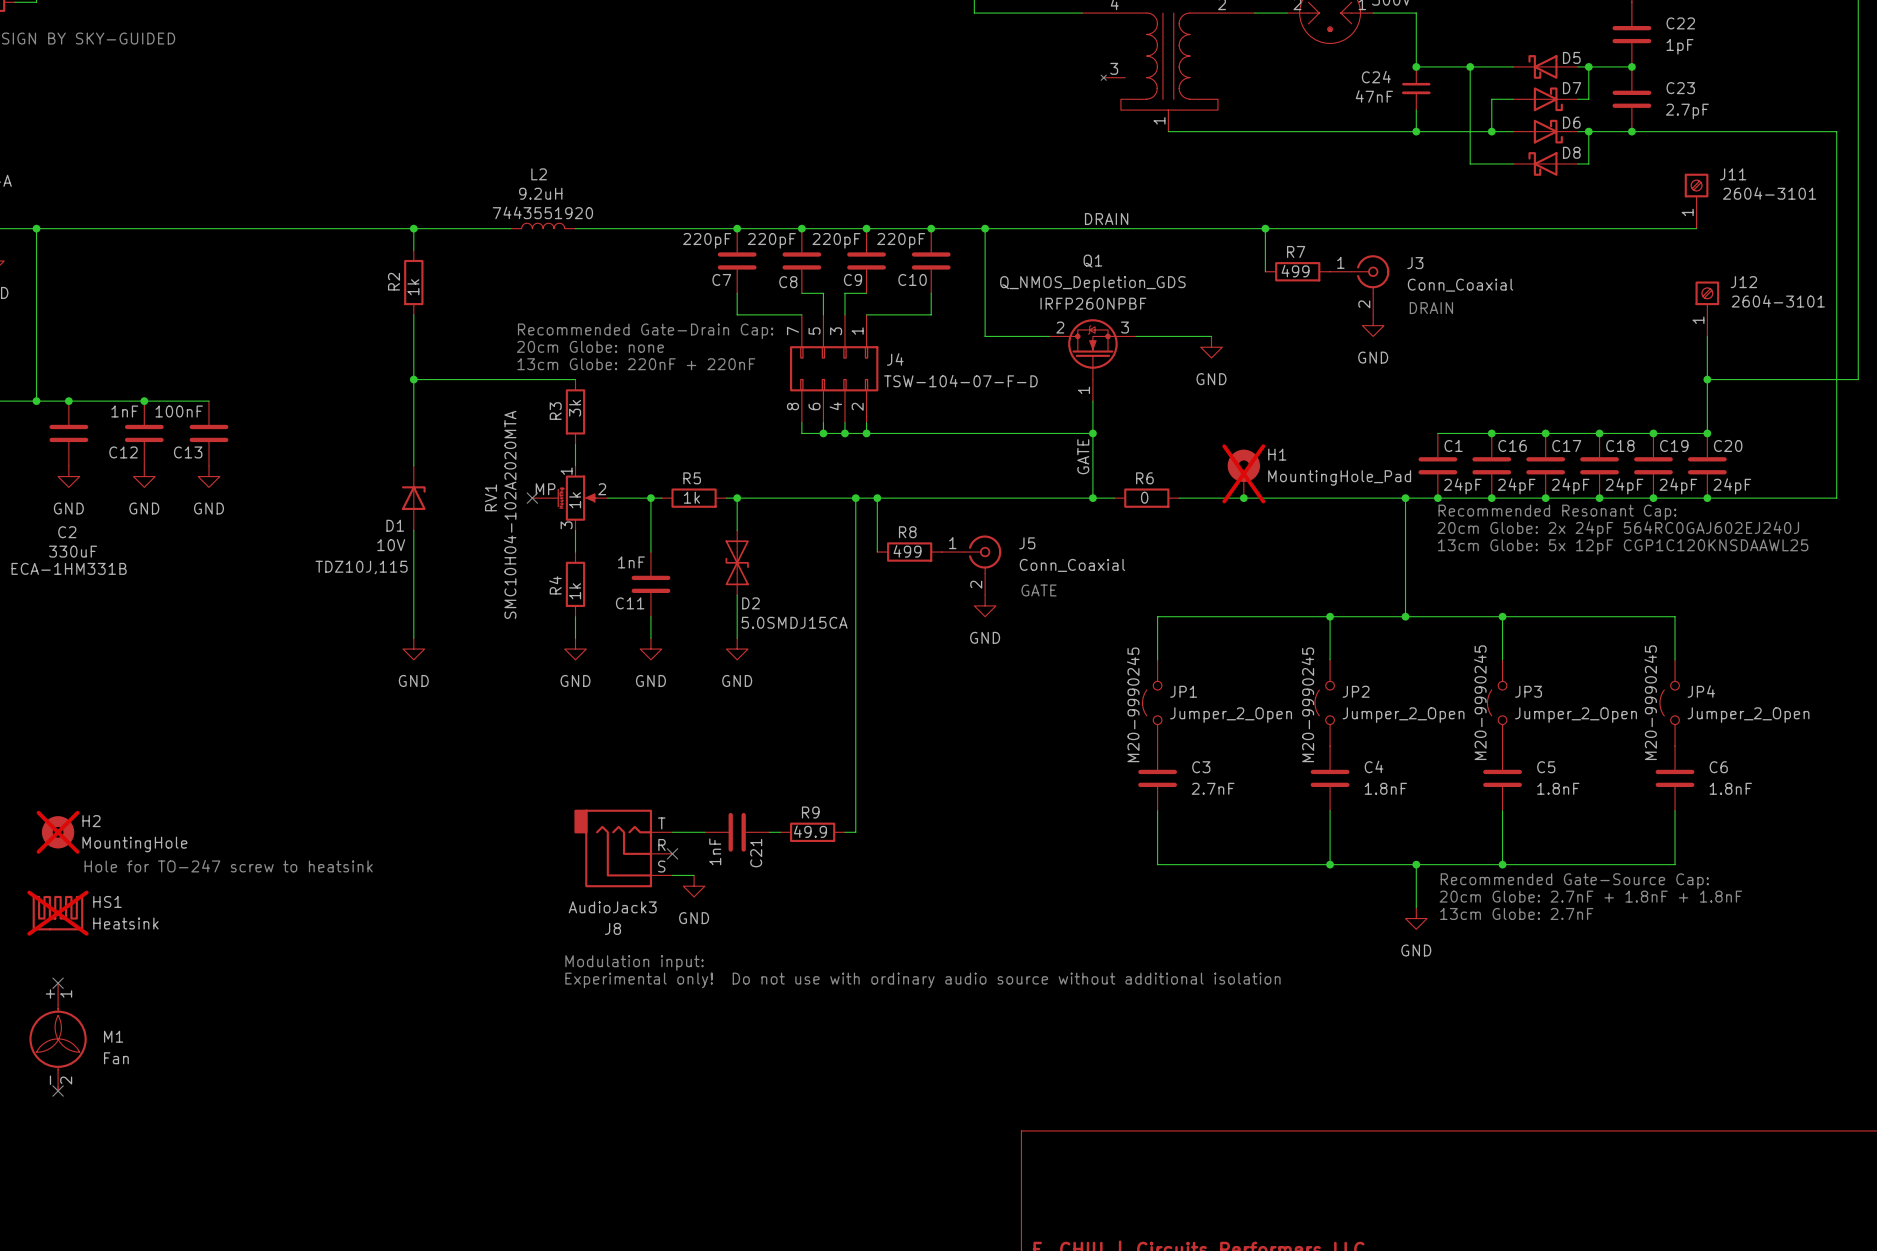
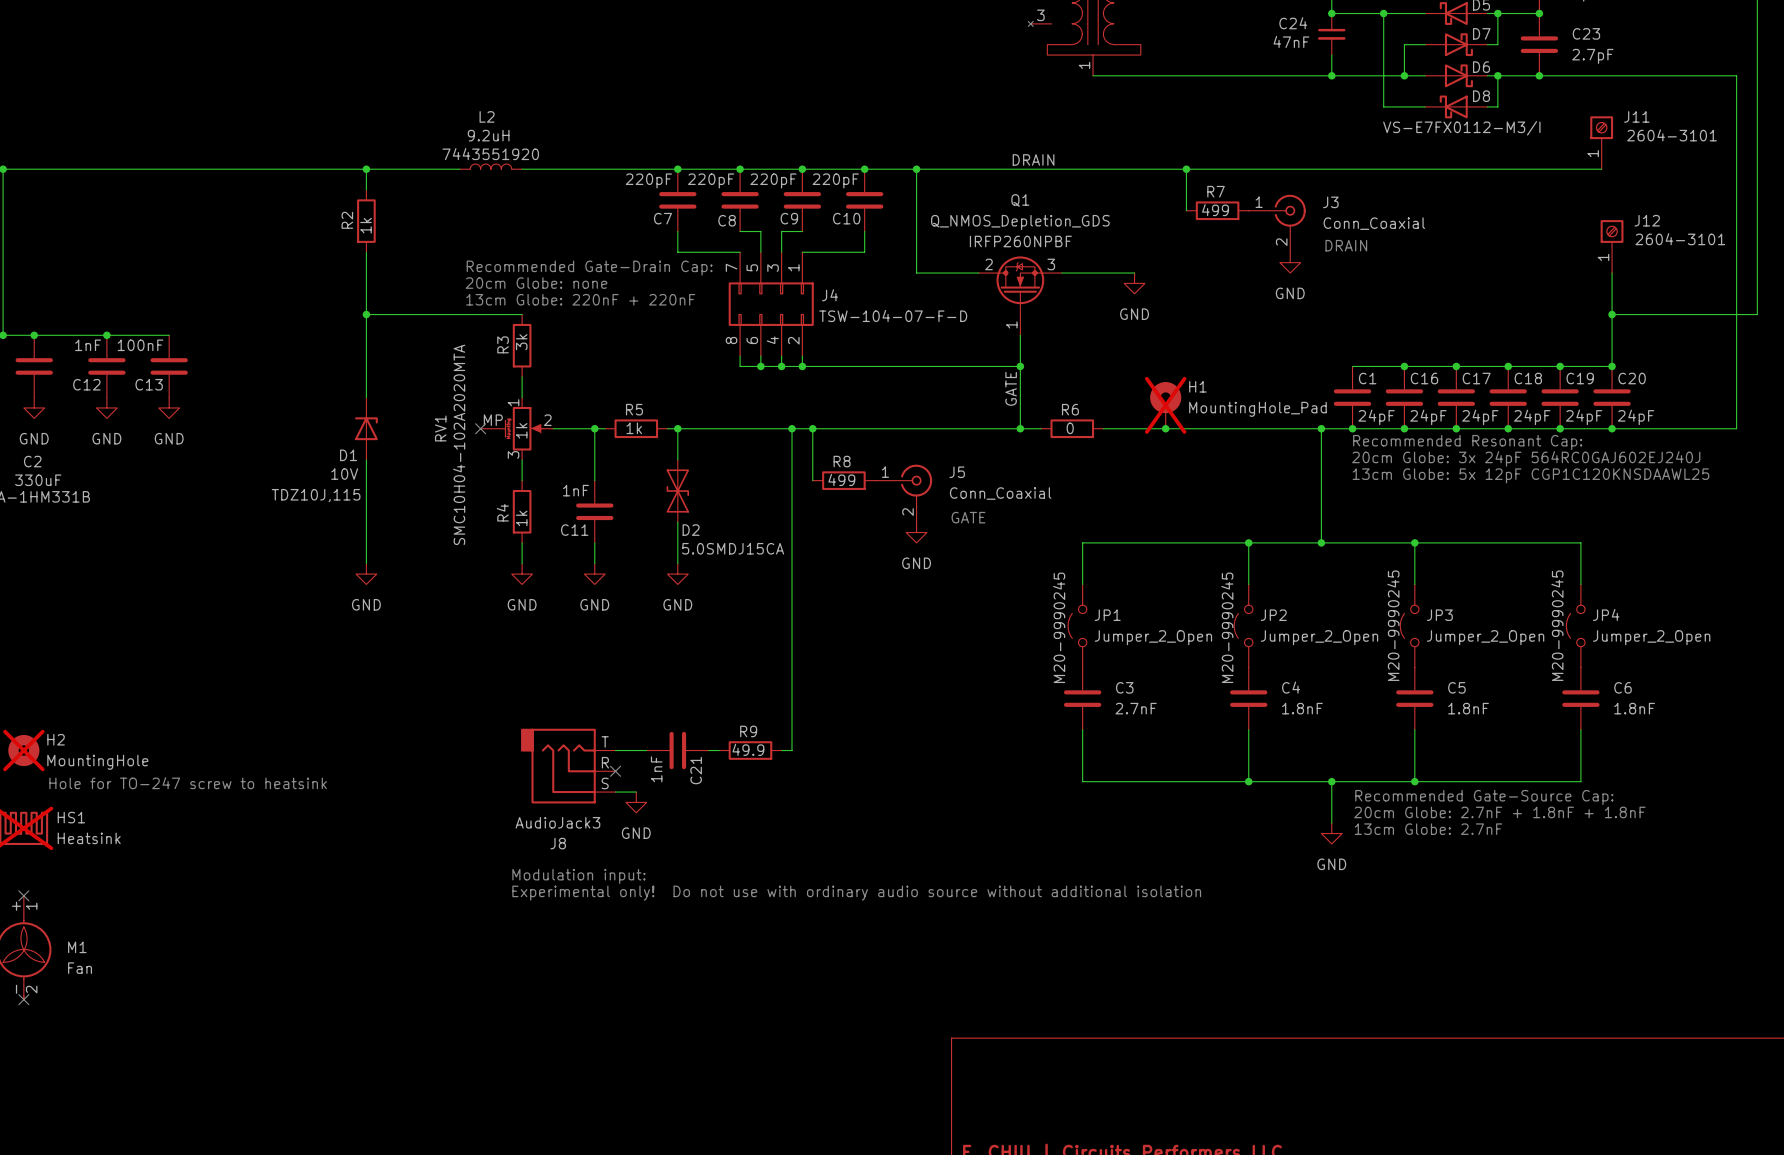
D8 text: none -> VS-E7FX0112-M3/I (1461, 128)
text: 20cm Globe: 2x 24pF 564RC0GAJ602EJ240J (1618, 529) -> 20cm Globe: 3x 24pF 564RC0GAJ602EJ240J (1526, 458)

